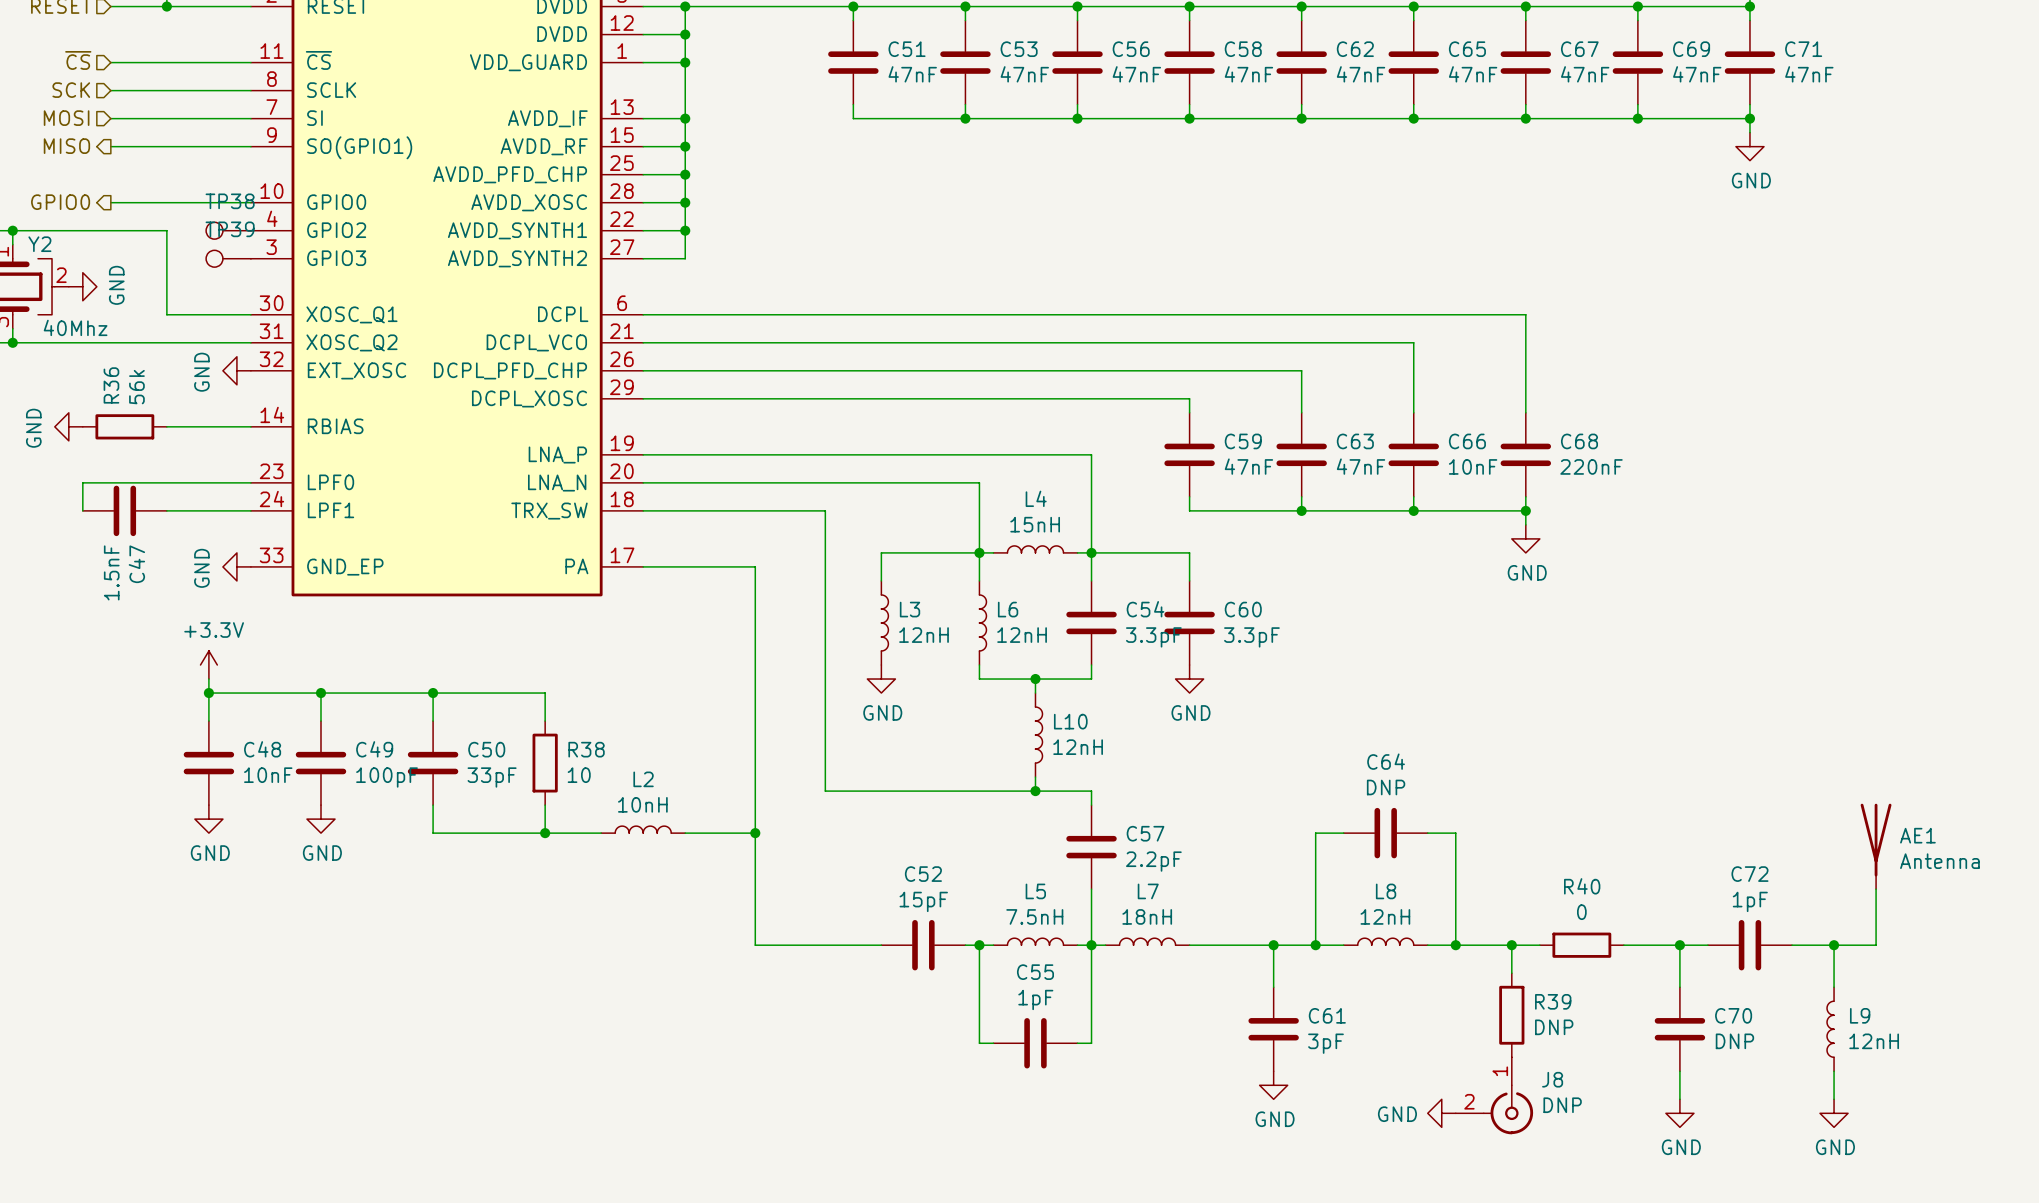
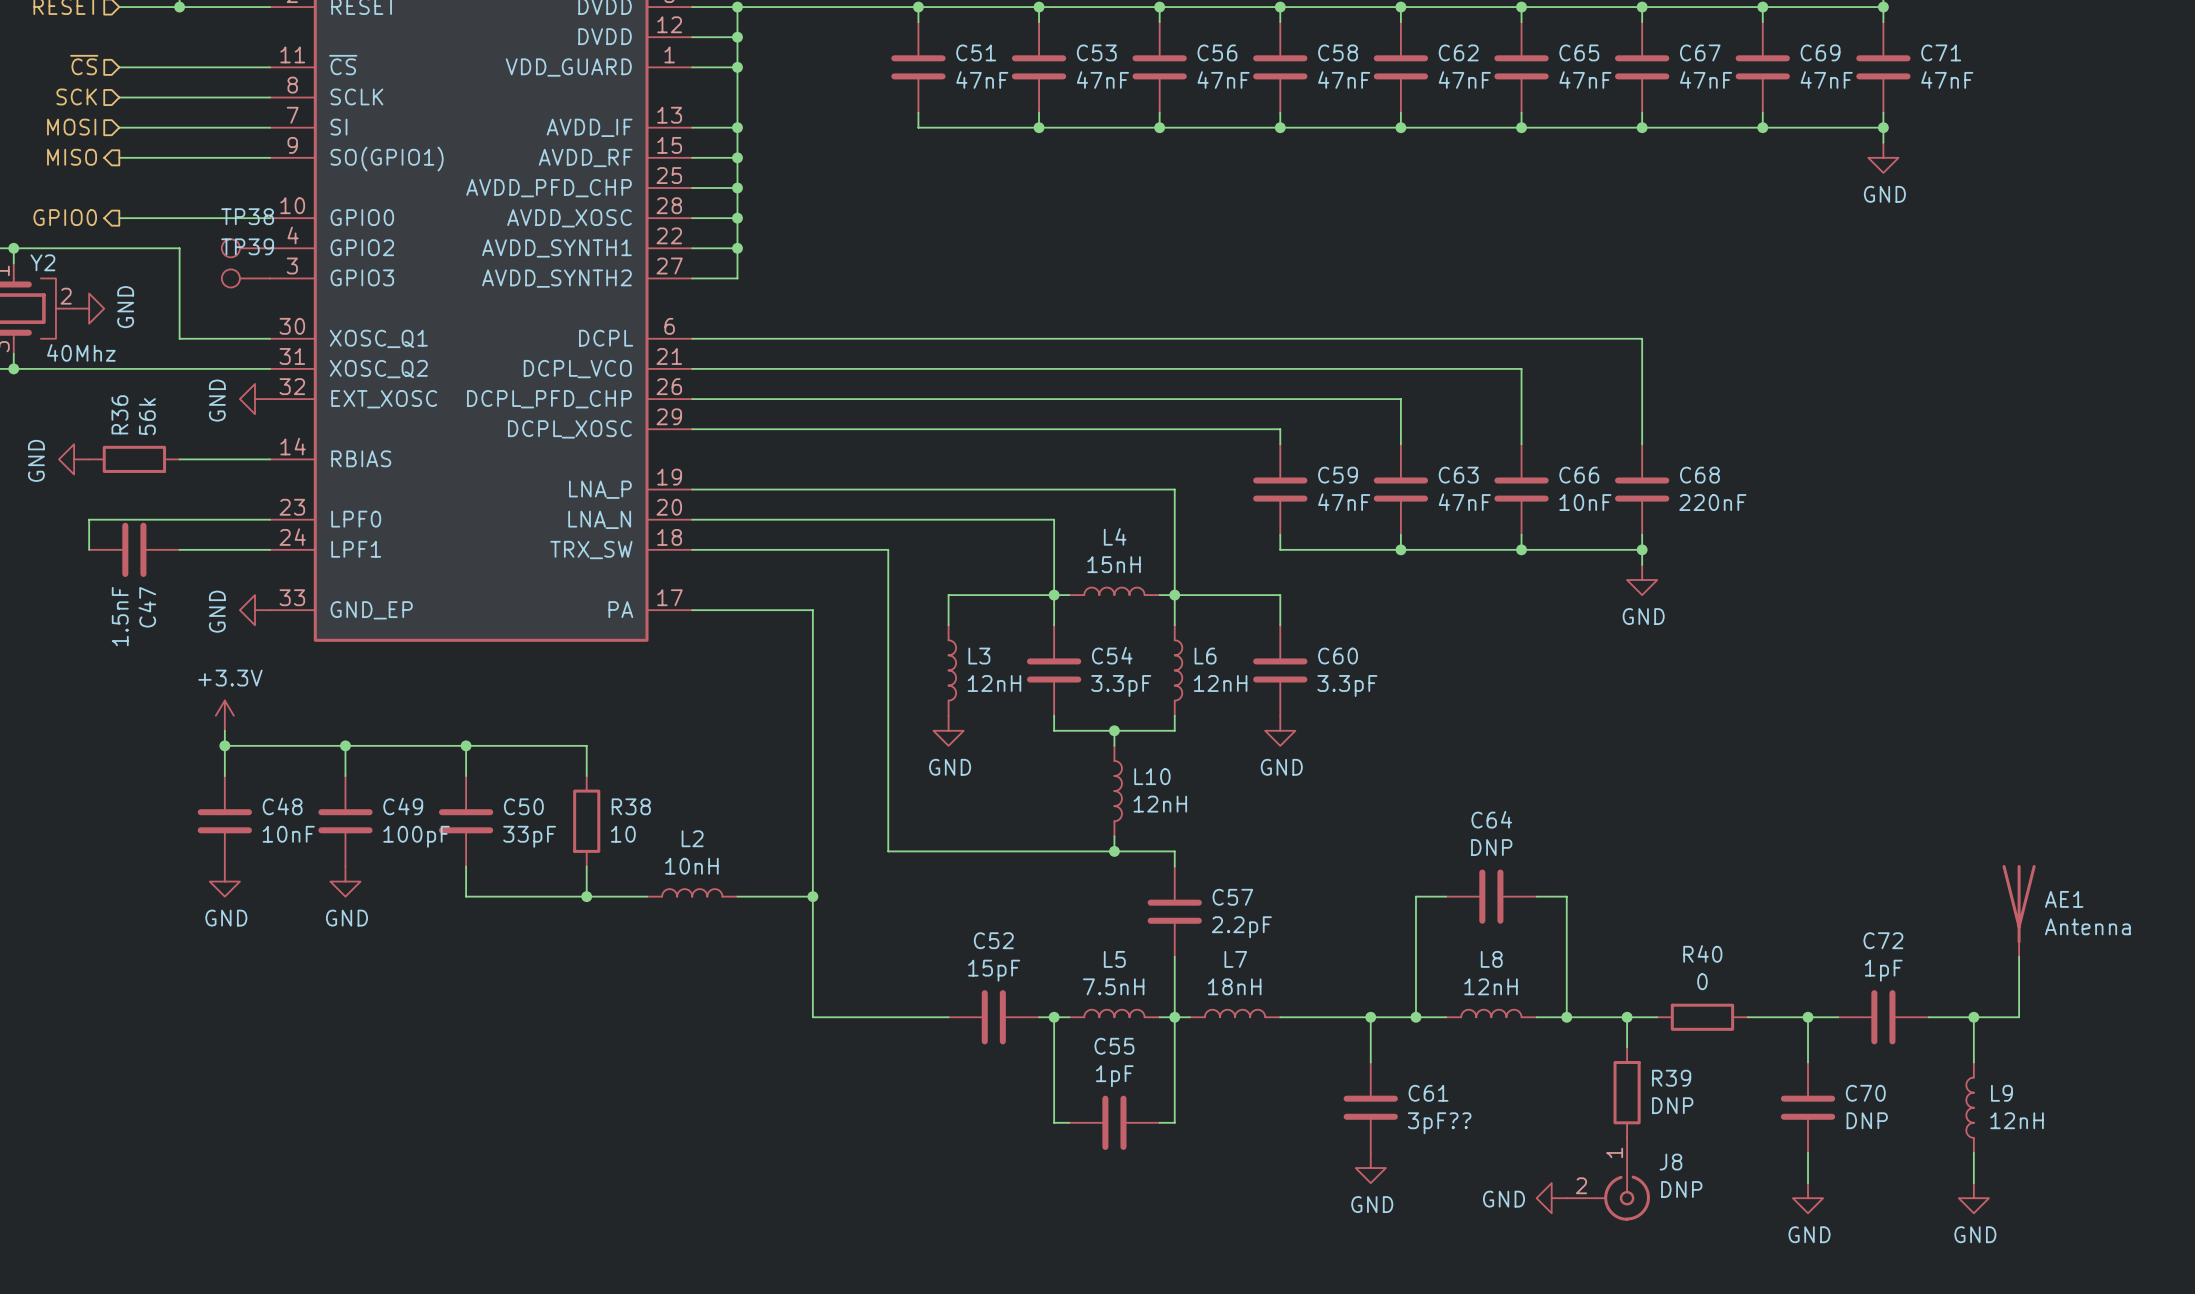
L6 position: (982, 622) -> (1178, 670)
C54 position: (1091, 622) -> (1054, 670)
C61 value: 3pF (1325, 1043) -> 3pF?? (1439, 1123)

